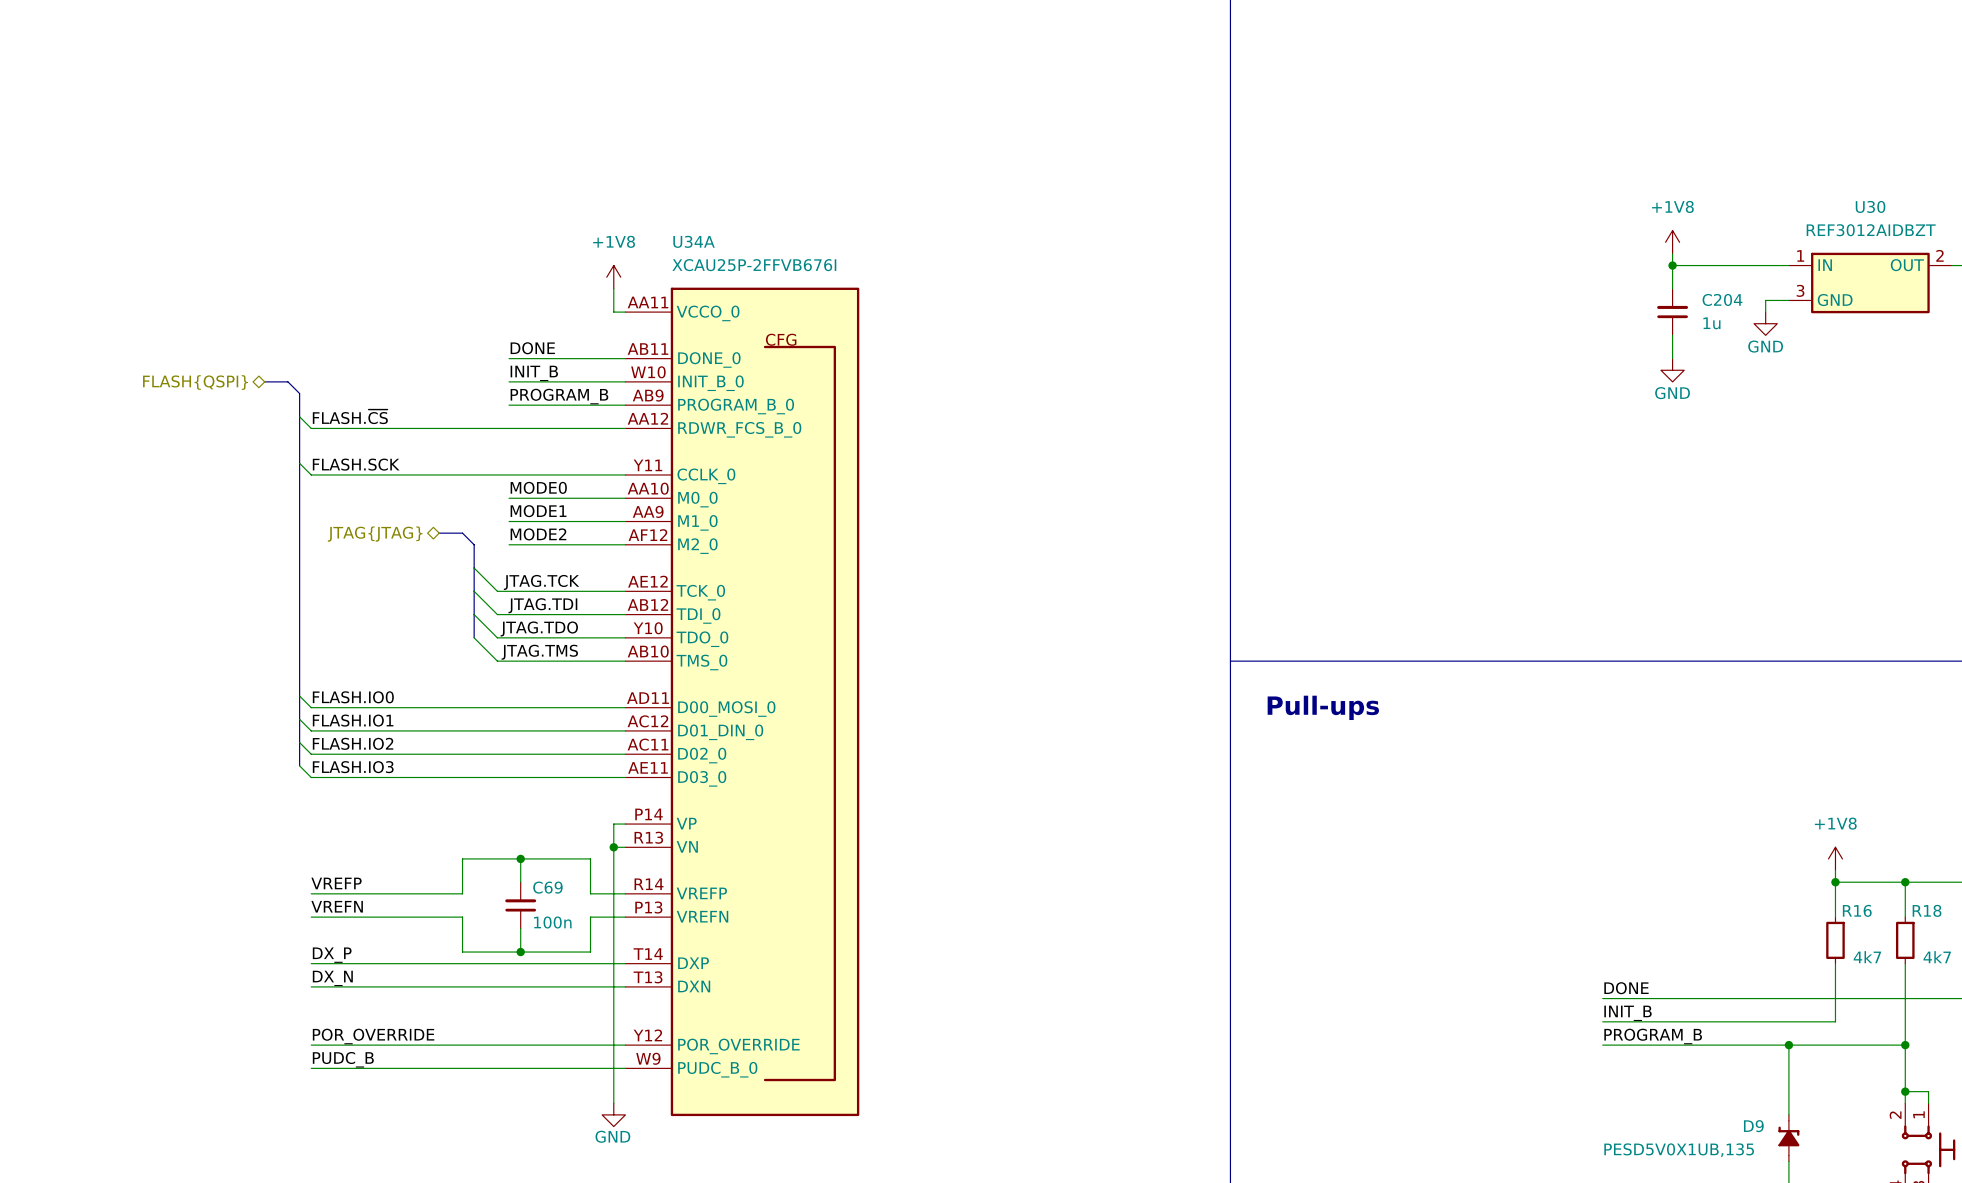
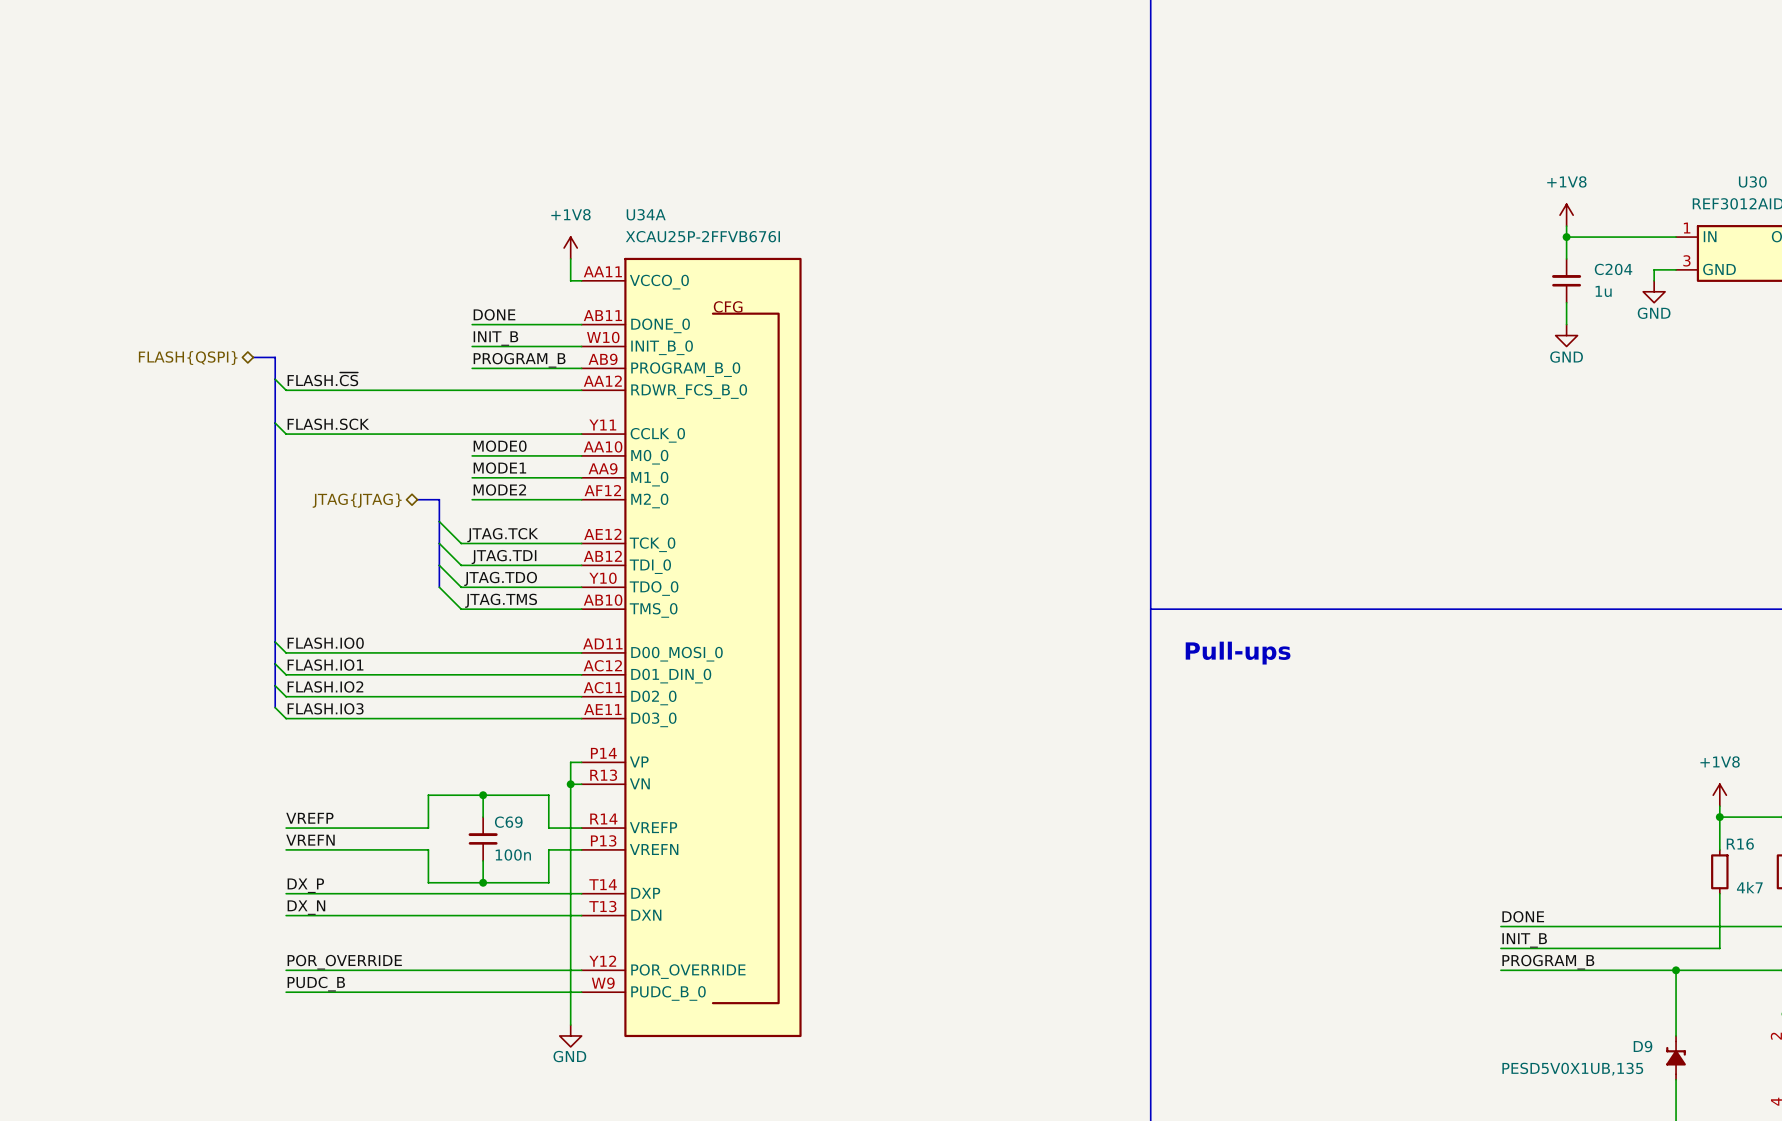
bus: (264, 381) (287, 381) (299, 393) -> (253, 357) (275, 357)
hierarchical label position: FLASH{QSPI} (195, 382) -> FLASH{QSPI} (188, 358)
bus: (439, 533) (462, 533) (474, 544) -> (417, 499) (439, 499)
hierarchical label position: JTAG{JTAG} (375, 534) -> JTAG{JTAG} (357, 500)

